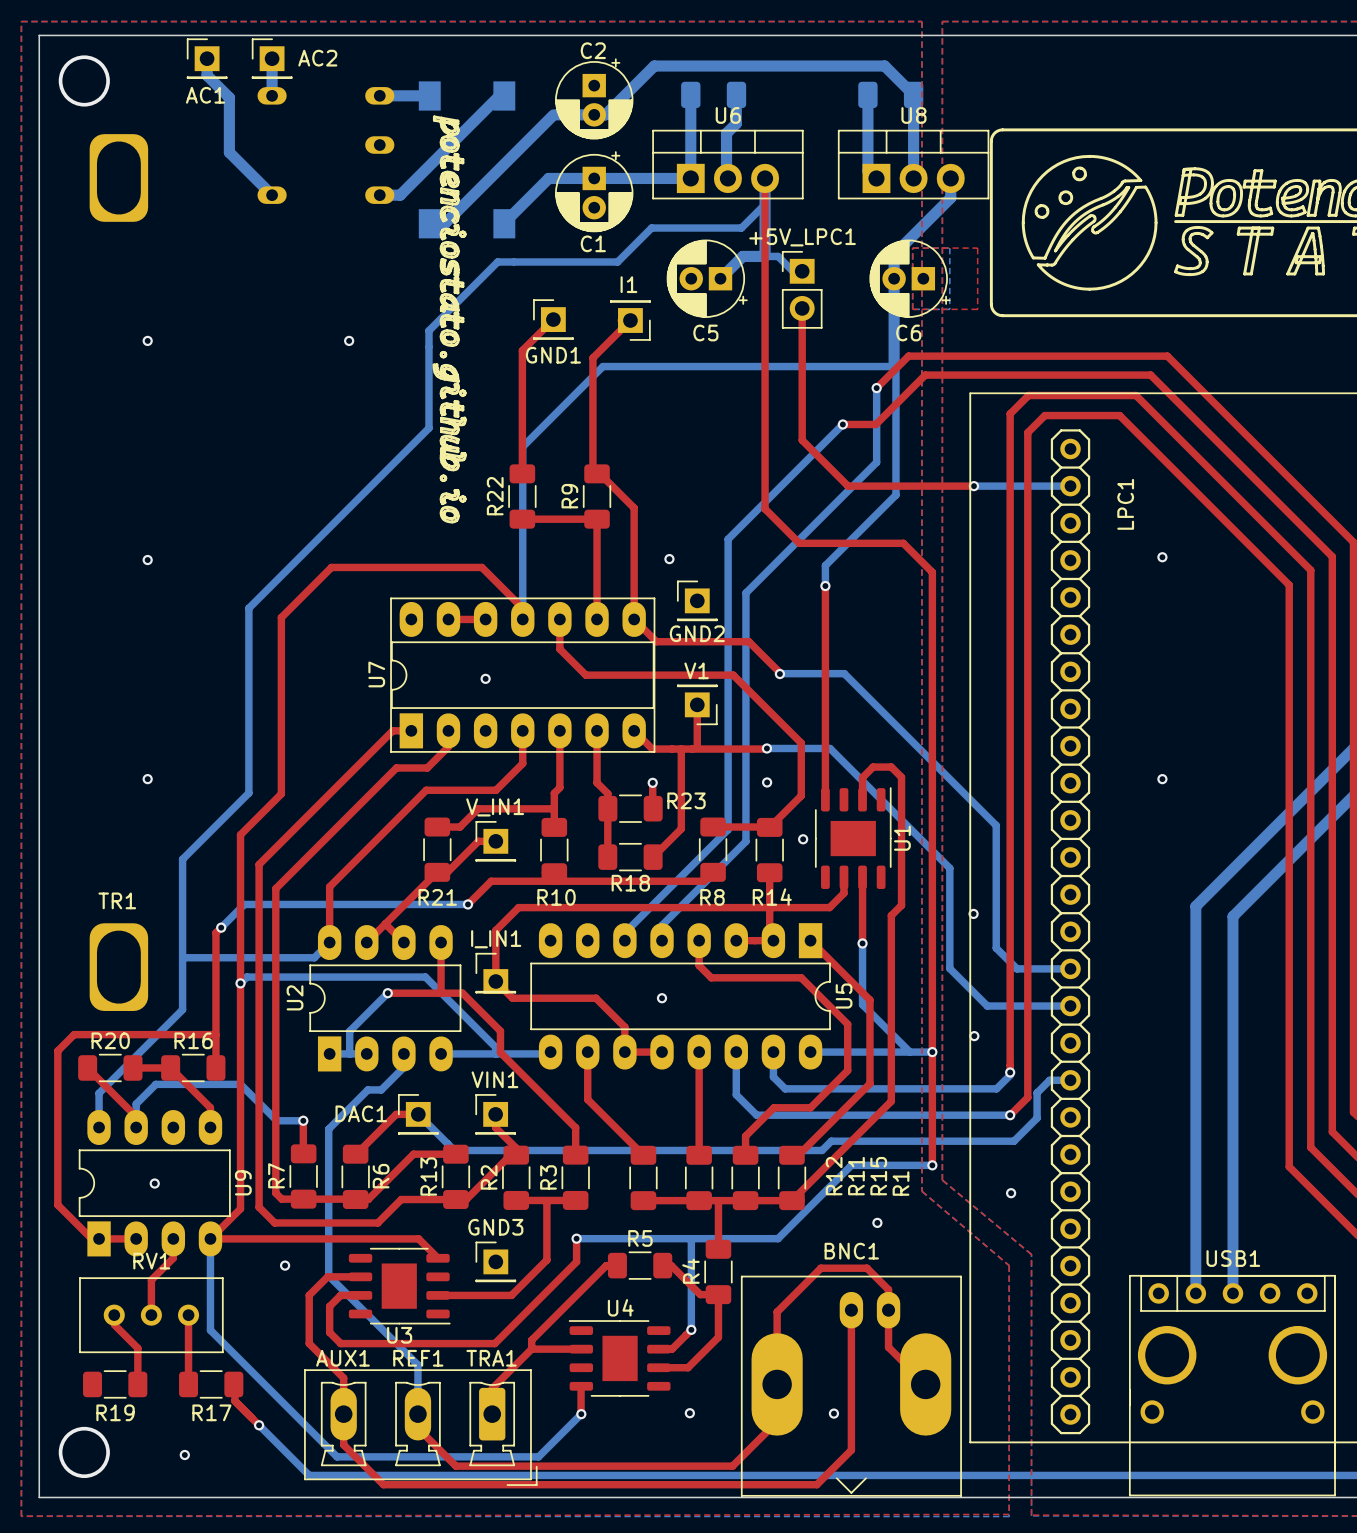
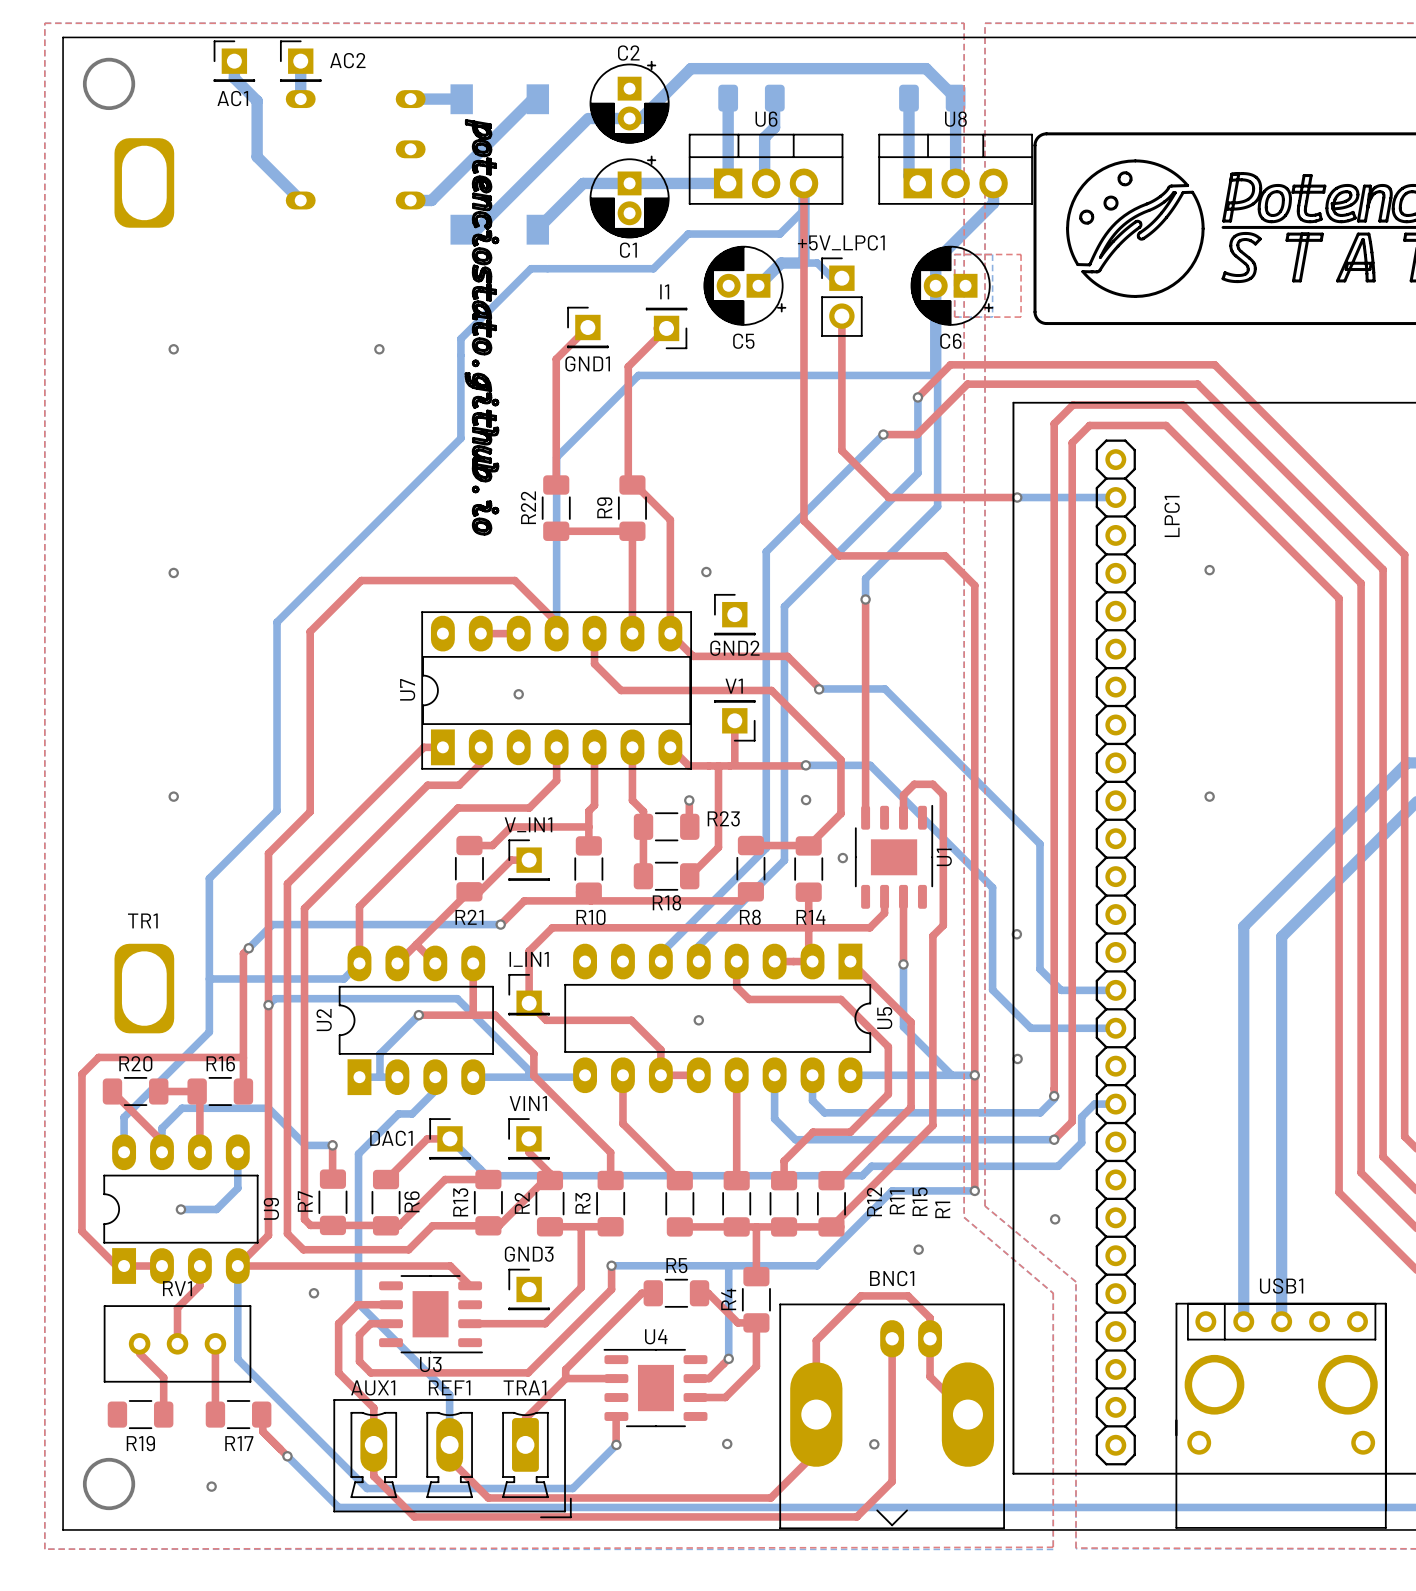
top track: (173, 1070) (210, 1107) (210, 1127) -> (199, 1094) (199, 1152)
bottom track: none -> (237, 1152) (237, 1188) (216, 1209) (180, 1209)

